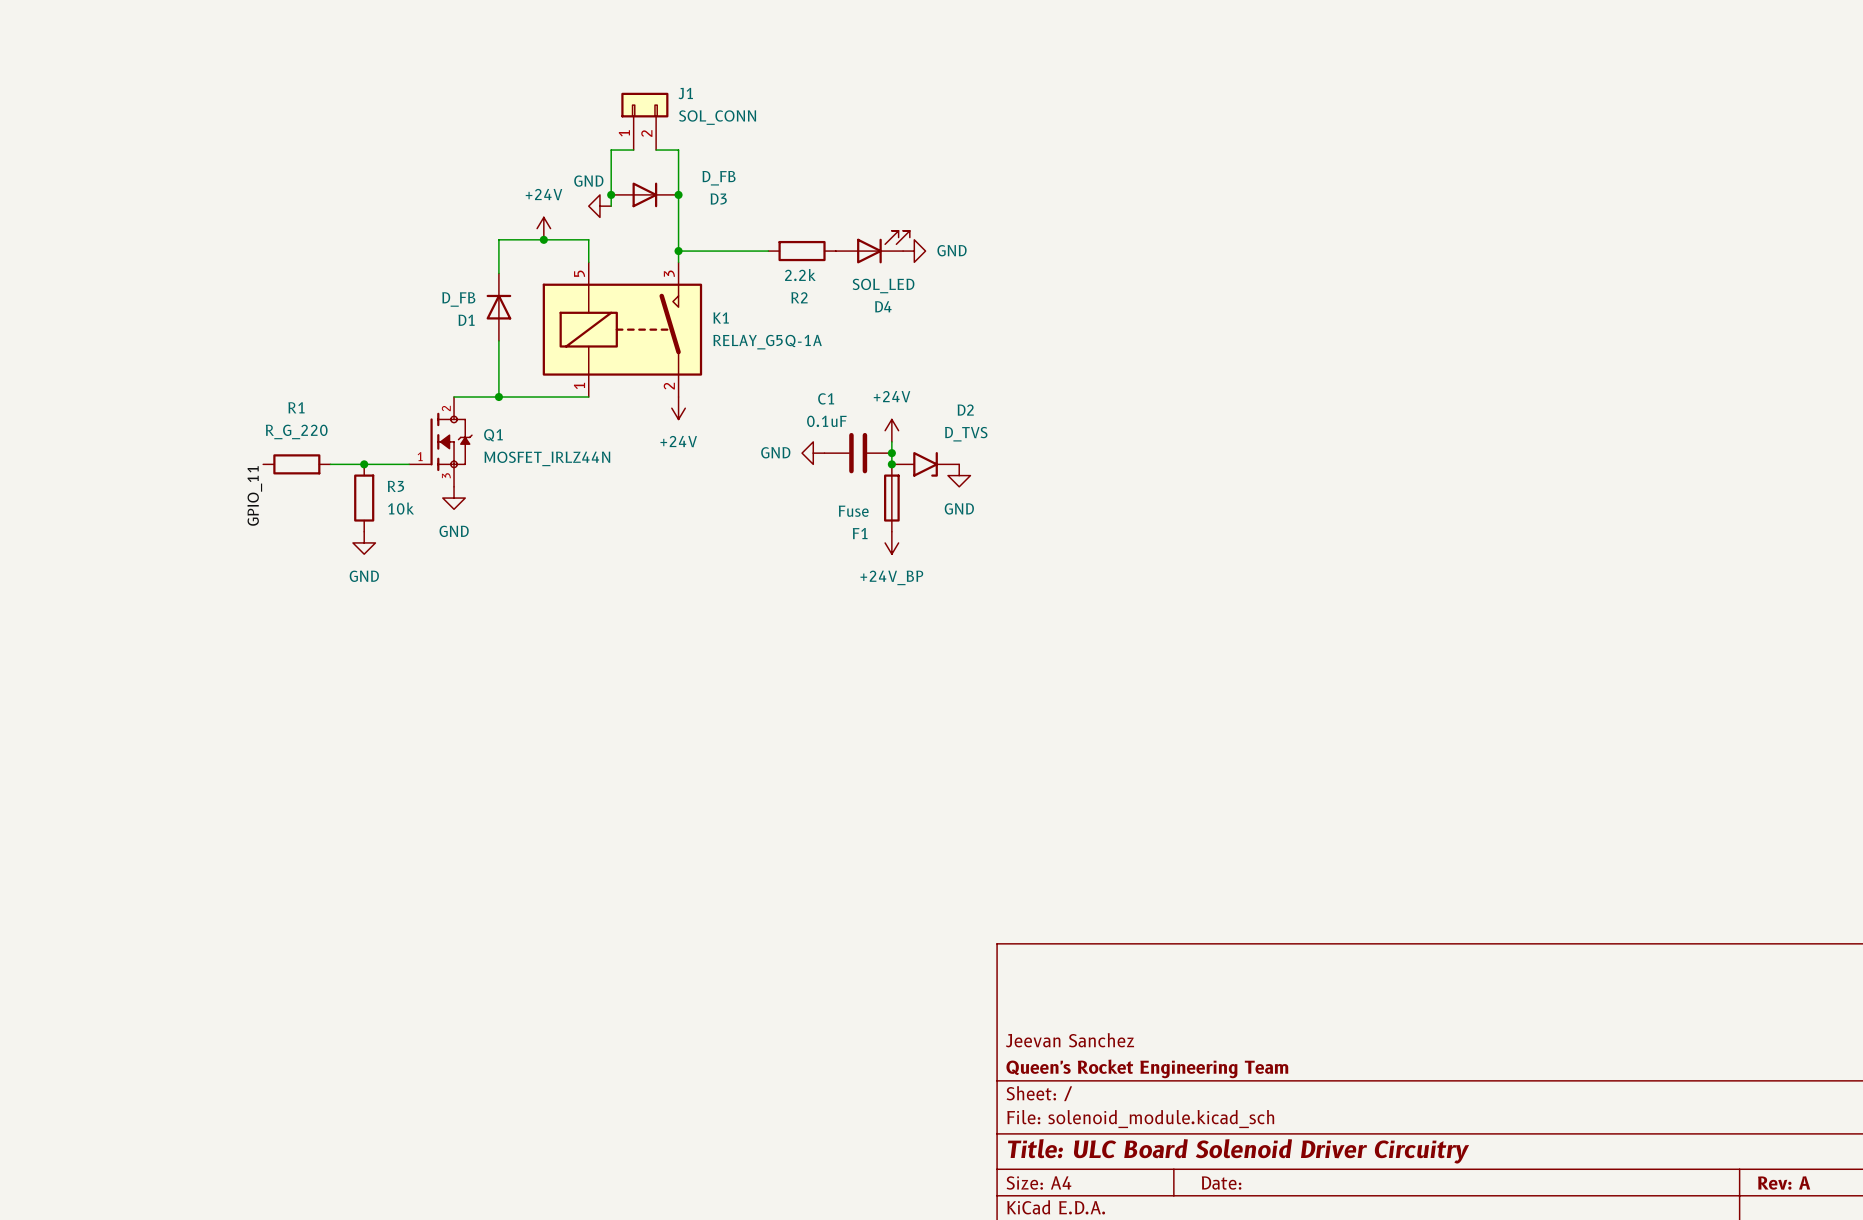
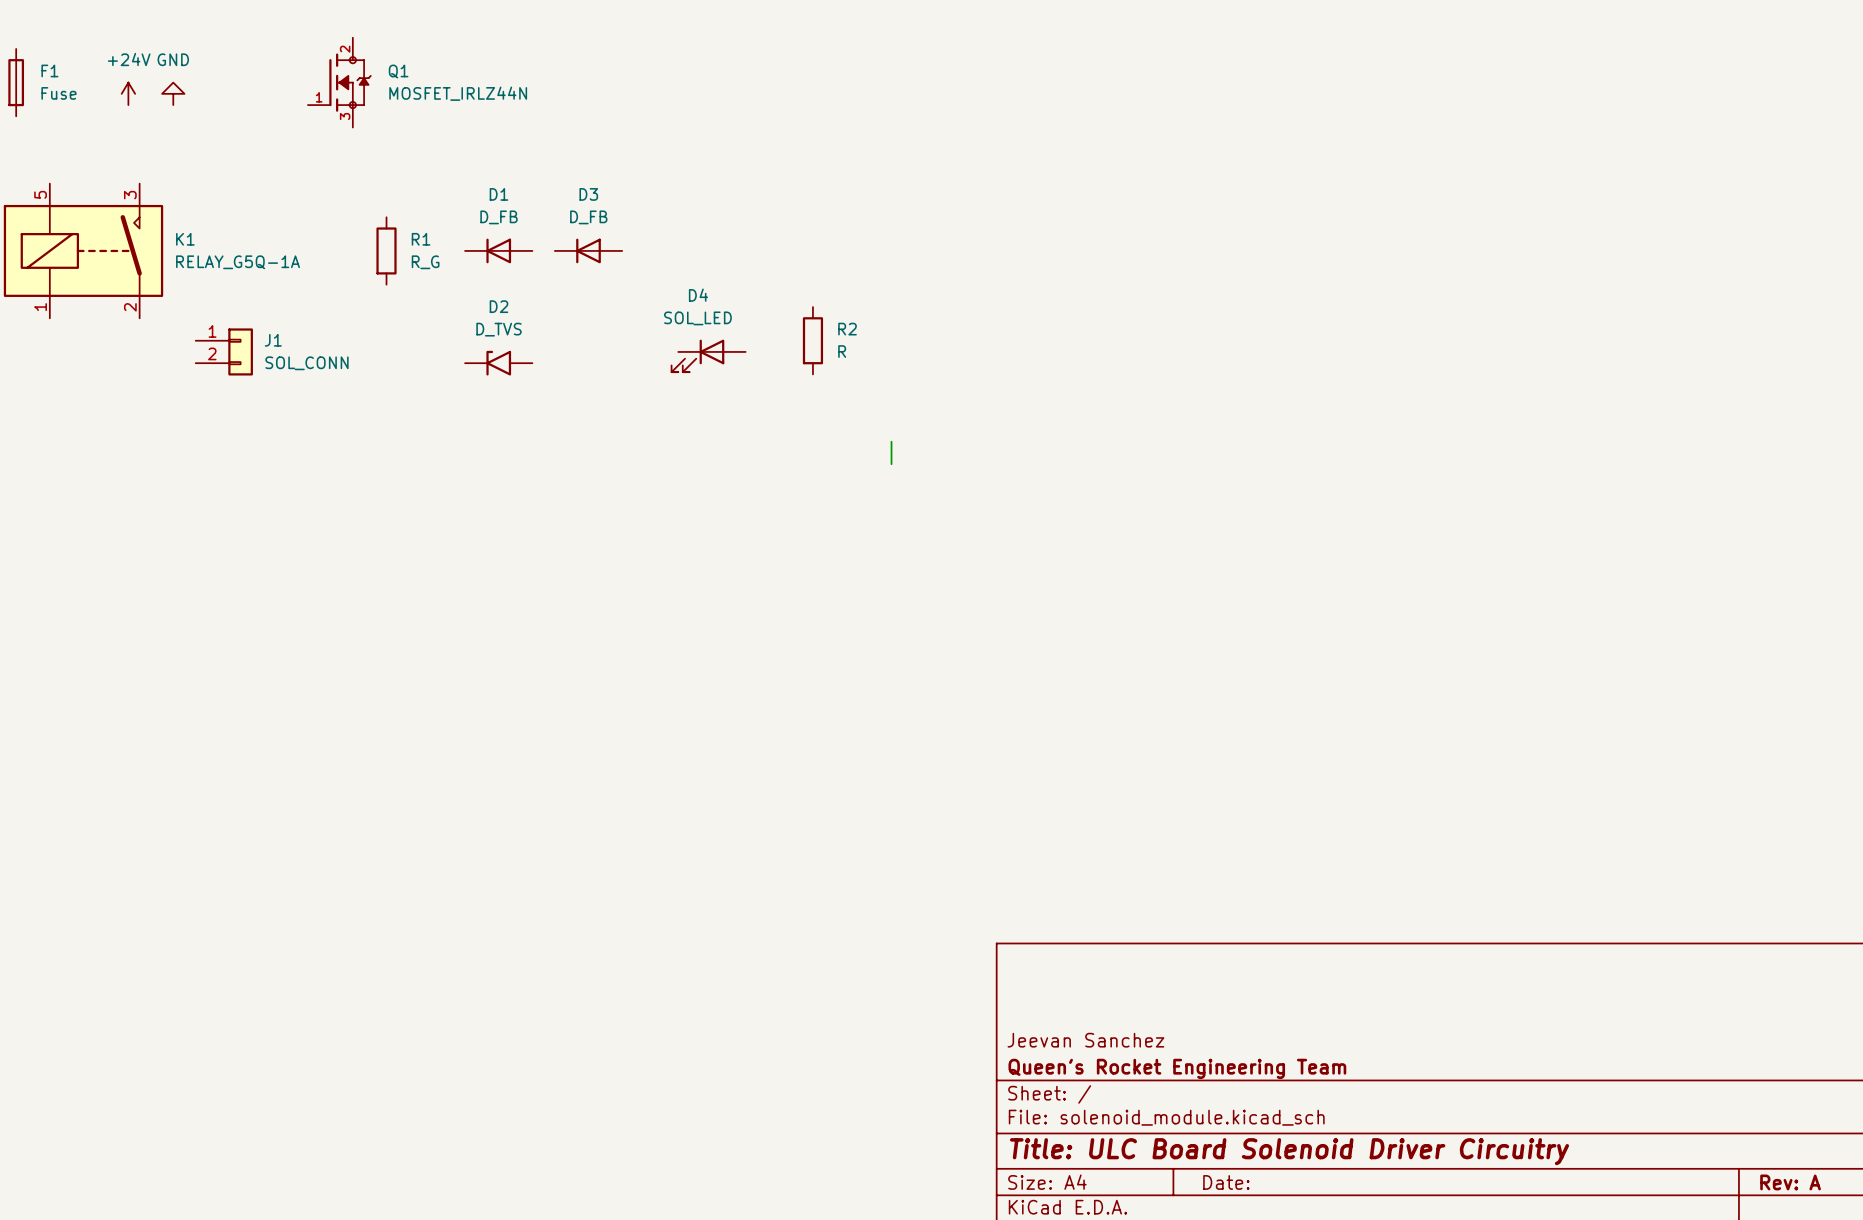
power symbol: none -> +24V (128, 93)
power symbol: none -> GND (173, 93)
J1 rotation: 0° (644, 105) -> 90° clockwise (240, 351)
J1 position: (644, 121) -> (224, 351)
wire: (633, 150) (611, 150) (611, 206) -> none
wire: (656, 150) (678, 150) (678, 262) -> none
D3 value position: D_FB (719, 178) -> D_FB (588, 217)
junction: (611, 194) -> none
D3 rotation: 0° (644, 194) -> 180° (588, 250)
D3 position: (644, 194) -> (588, 250)
junction: (678, 194) -> none
D3 name position: D3 (718, 199) -> D3 (588, 194)
power symbol: GND (599, 206) -> none
power symbol: +24V (543, 228) -> none
junction: (543, 239) -> none
D4 position: (872, 247) -> (708, 355)
D4 rotation: 0° (883, 247) -> 180° (697, 355)
wire: (678, 251) (768, 251) -> none
junction: (678, 251) -> none
R2 rotation: 0° (802, 251) -> 90° clockwise (812, 340)
R2 position: (802, 251) -> (812, 340)
power symbol: GND (914, 251) -> none
wire: (588, 262) (588, 239) (498, 239) (498, 273) -> none
R2 value: 2.2k (800, 275) -> R (842, 351)
R2 name position: R2 (799, 297) -> R2 (847, 329)
D1 value position: D_FB (458, 299) -> D_FB (499, 217)
D1 rotation: 0° (498, 307) -> 90° counterclockwise (498, 250)
D1 position: (498, 307) -> (498, 250)
D1 name position: D1 (466, 320) -> D1 (499, 194)
K1 position: (622, 329) -> (83, 250)
wire: (498, 340) (498, 397) -> none
wire: (454, 397) (588, 397) -> none
junction: (498, 397) -> none
R1 name position: R1 (296, 407) -> R1 (421, 239)
power symbol: +24V (678, 408) -> none
D2 name position: D2 (965, 410) -> D2 (499, 306)
power symbol: +24V (891, 430) -> none
R1 value: R_G_220 (296, 431) -> R_G (425, 262)
D2 value position: D_TVS (966, 434) -> D_TVS (499, 329)
Q1 name position: Q1 (493, 435) -> Q1 (398, 71)
Q1 position: (440, 441) -> (339, 82)
power symbol: GND (813, 453) -> none
C1: 0.1uF (858, 453) -> none
junction: (891, 453) -> none
Q1 value position: MOSFET_IRLZ44N (547, 458) -> MOSFET_IRLZ44N (458, 93)
R1 rotation: 0° (296, 464) -> 90° clockwise (386, 250)
R1 position: (296, 464) -> (386, 250)
wire: (330, 464) (409, 464) -> none
junction: (364, 464) -> none
junction: (891, 464) -> none
D2 rotation: 0° (925, 464) -> 180° (498, 363)
D2 position: (925, 464) -> (498, 363)
power symbol: GND (959, 475) -> none
label: GPIO_11 (254, 495) -> none
R3: 10k (364, 498) -> none
power symbol: GND (454, 498) -> none
F1 position: (891, 498) -> (16, 82)
F1 value position: Fuse (853, 511) -> Fuse (59, 93)
F1 name position: F1 (860, 533) -> F1 (49, 70)
power symbol: GND (364, 542) -> none
power symbol: +24V_BP (891, 542) -> none

